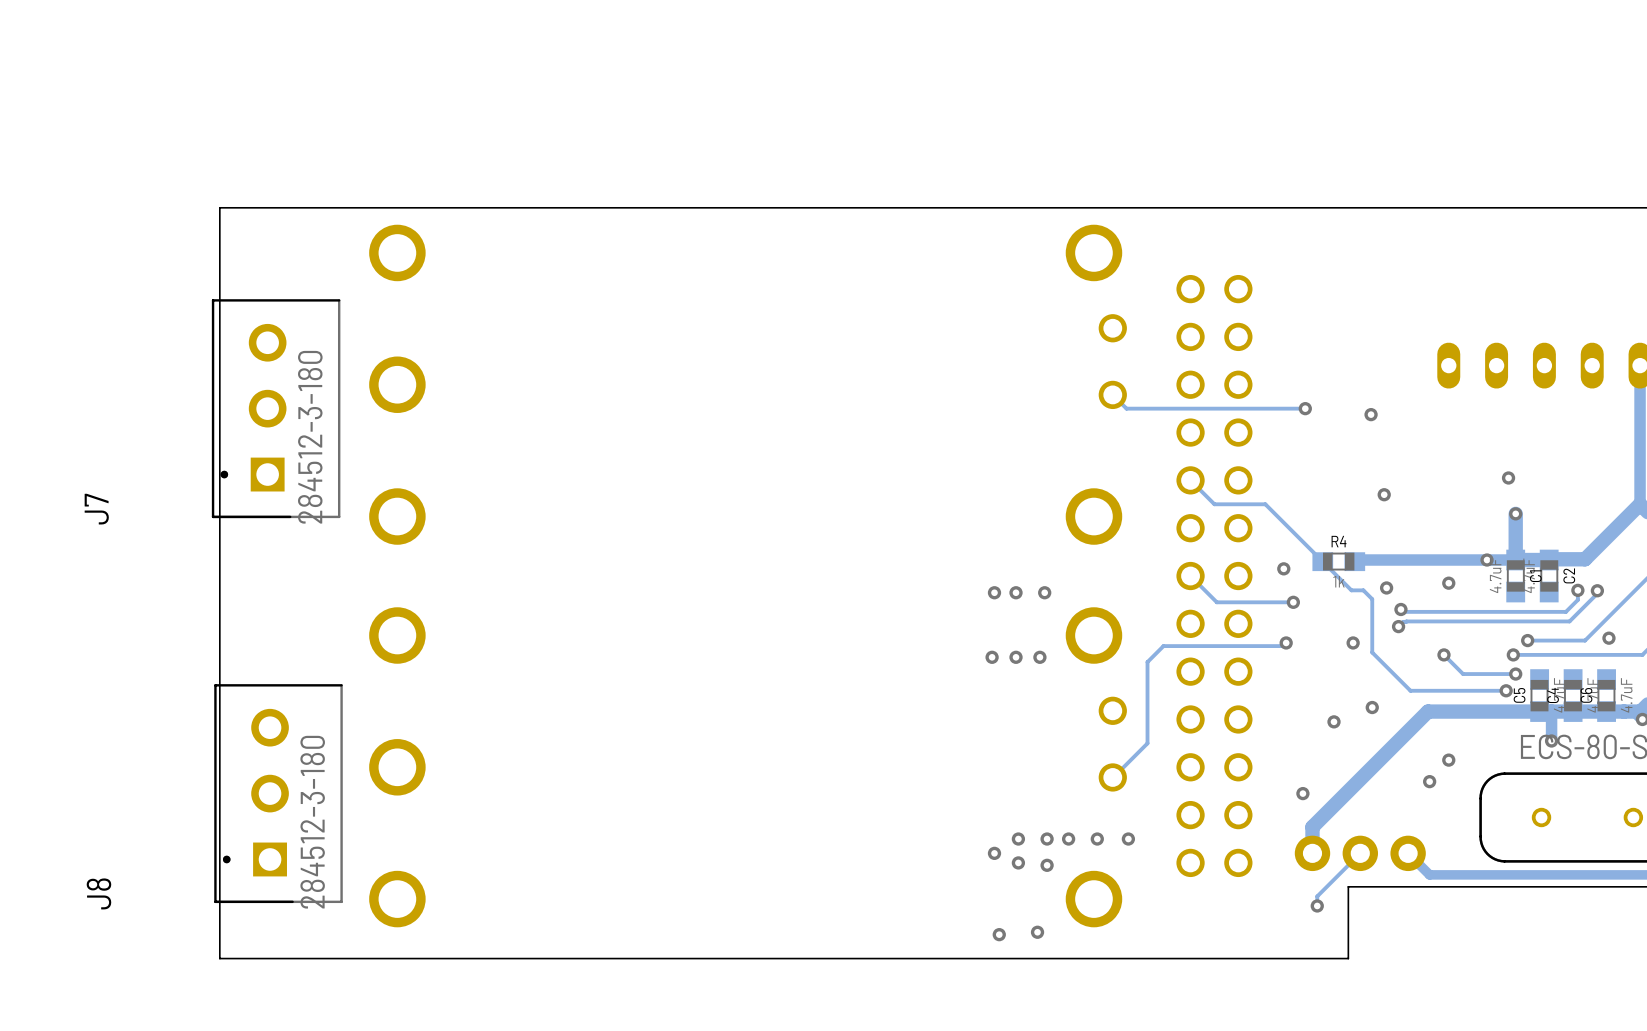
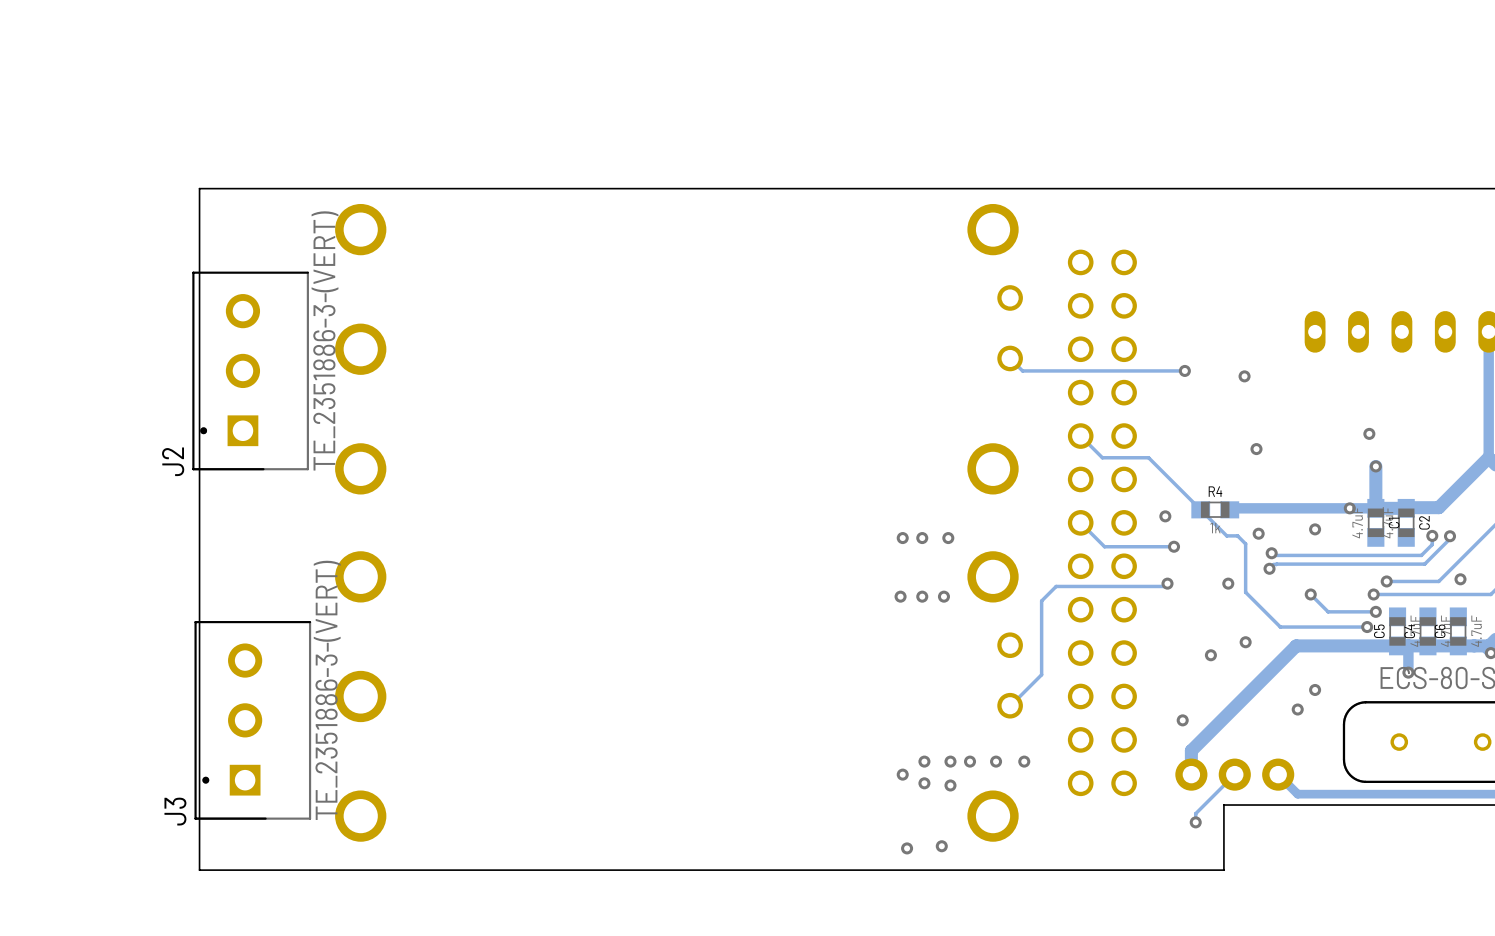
J7 value: 284512-3-180 (310, 437) -> TE_2351886-3-(VERT) (325, 340)
J7 name: J7 (96, 509) -> J2 (173, 461)
J8 value: 284512-3-180 (312, 822) -> TE_2351886-3-(VERT) (327, 690)
J8 name: J8 (98, 893) -> J3 (175, 811)

